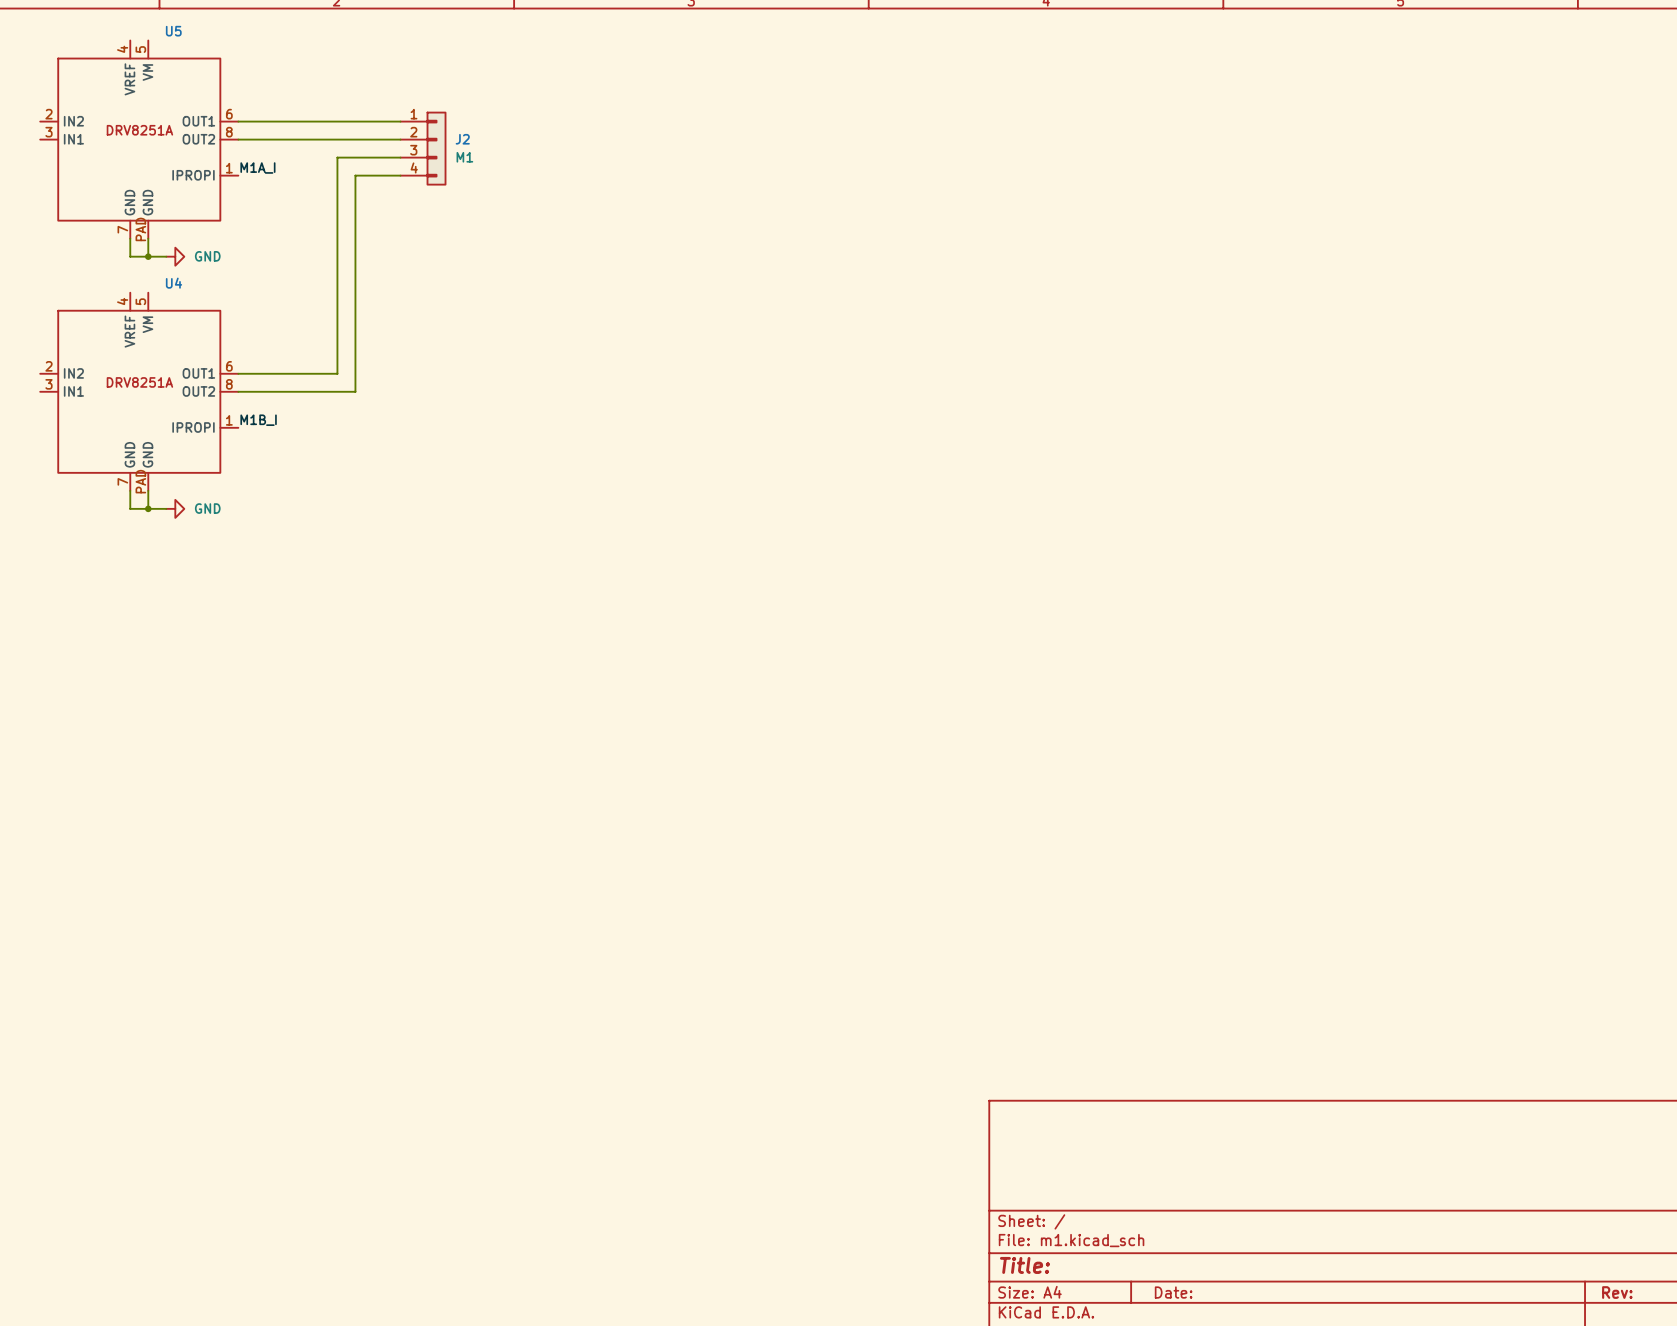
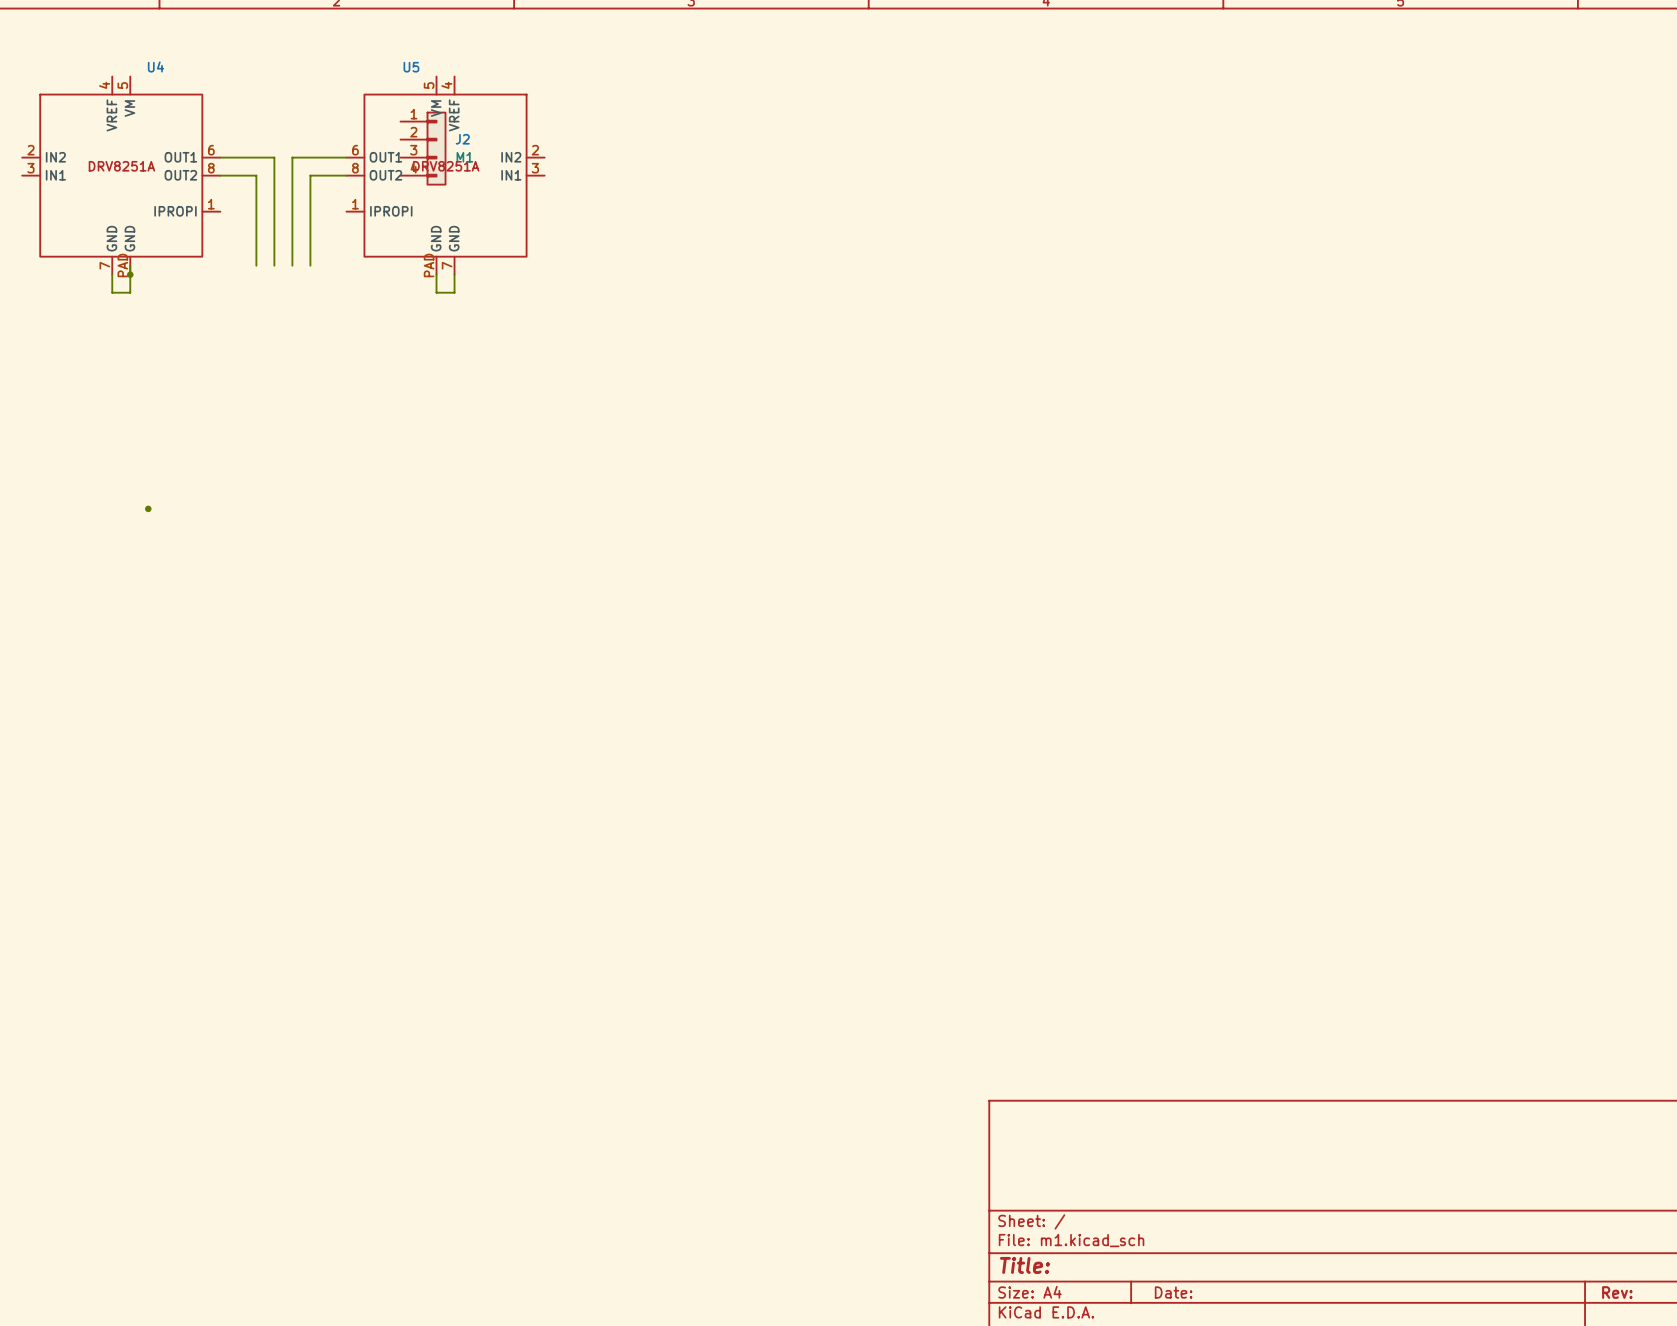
wire: (238, 121) (400, 121) -> none
U5 flip: as is (139, 139) -> left-right (445, 175)
U5 position: (139, 139) -> (445, 175)
wire: (238, 139) (400, 139) -> none
wire: none -> (220, 157) (274, 157) (274, 265)
wire: (337, 157) (337, 373) (238, 373) -> (337, 157) (292, 157) (292, 265)
label: M1A_I (257, 168) -> none
wire: none -> (220, 175) (256, 175) (256, 265)
wire: none -> (346, 175) (310, 175) (310, 265)
wire: (400, 175) (355, 175) (355, 391) (238, 391) -> none
wire: (148, 238) (148, 256) -> none
junction position: (148, 256) -> (130, 274)
power symbol: GND (175, 256) -> none
wire: none -> (130, 265) (130, 292) (112, 292) (112, 274)
wire: none -> (436, 274) (436, 292) (454, 292) (454, 274)
U4 position: (139, 391) -> (121, 175)
label: M1B_I (258, 420) -> none
wire: (130, 490) (130, 508) (166, 508) -> none
wire: (148, 490) (148, 508) -> none
power symbol: GND (175, 508) -> none

